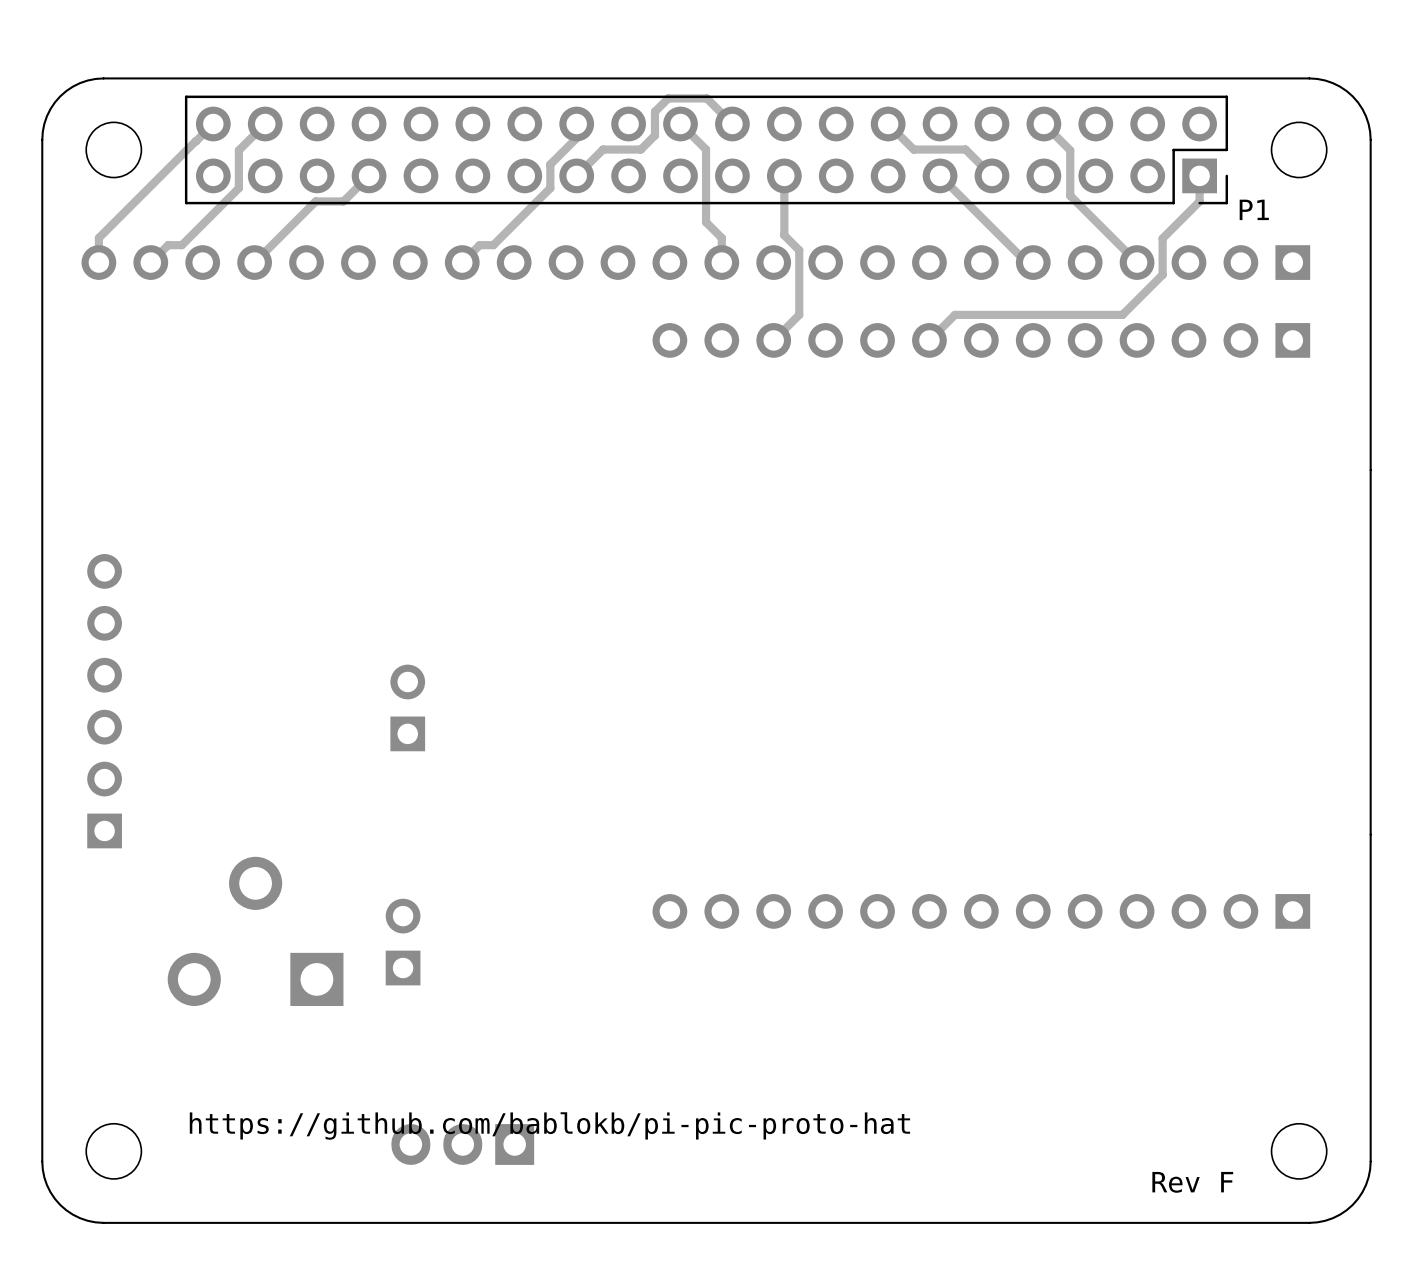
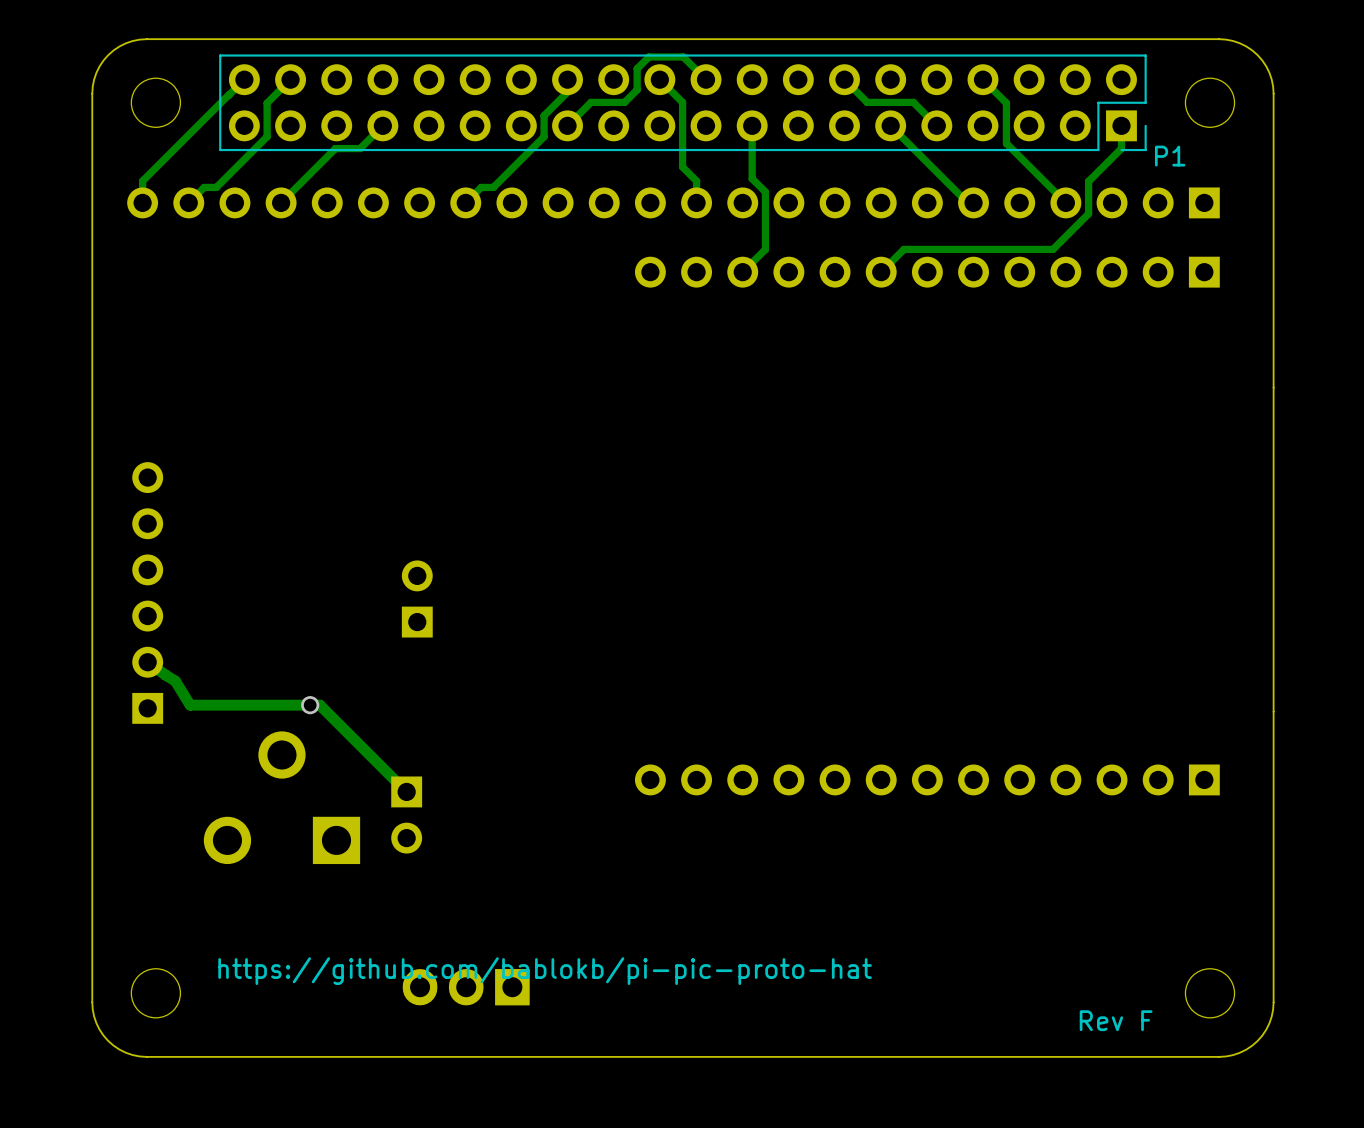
track: none -> (147, 662) (175, 681) (190, 705) (319, 705) (406, 791)
via: none -> (310, 705)
part rotation: 0° (403, 942) -> 180° (406, 815)

